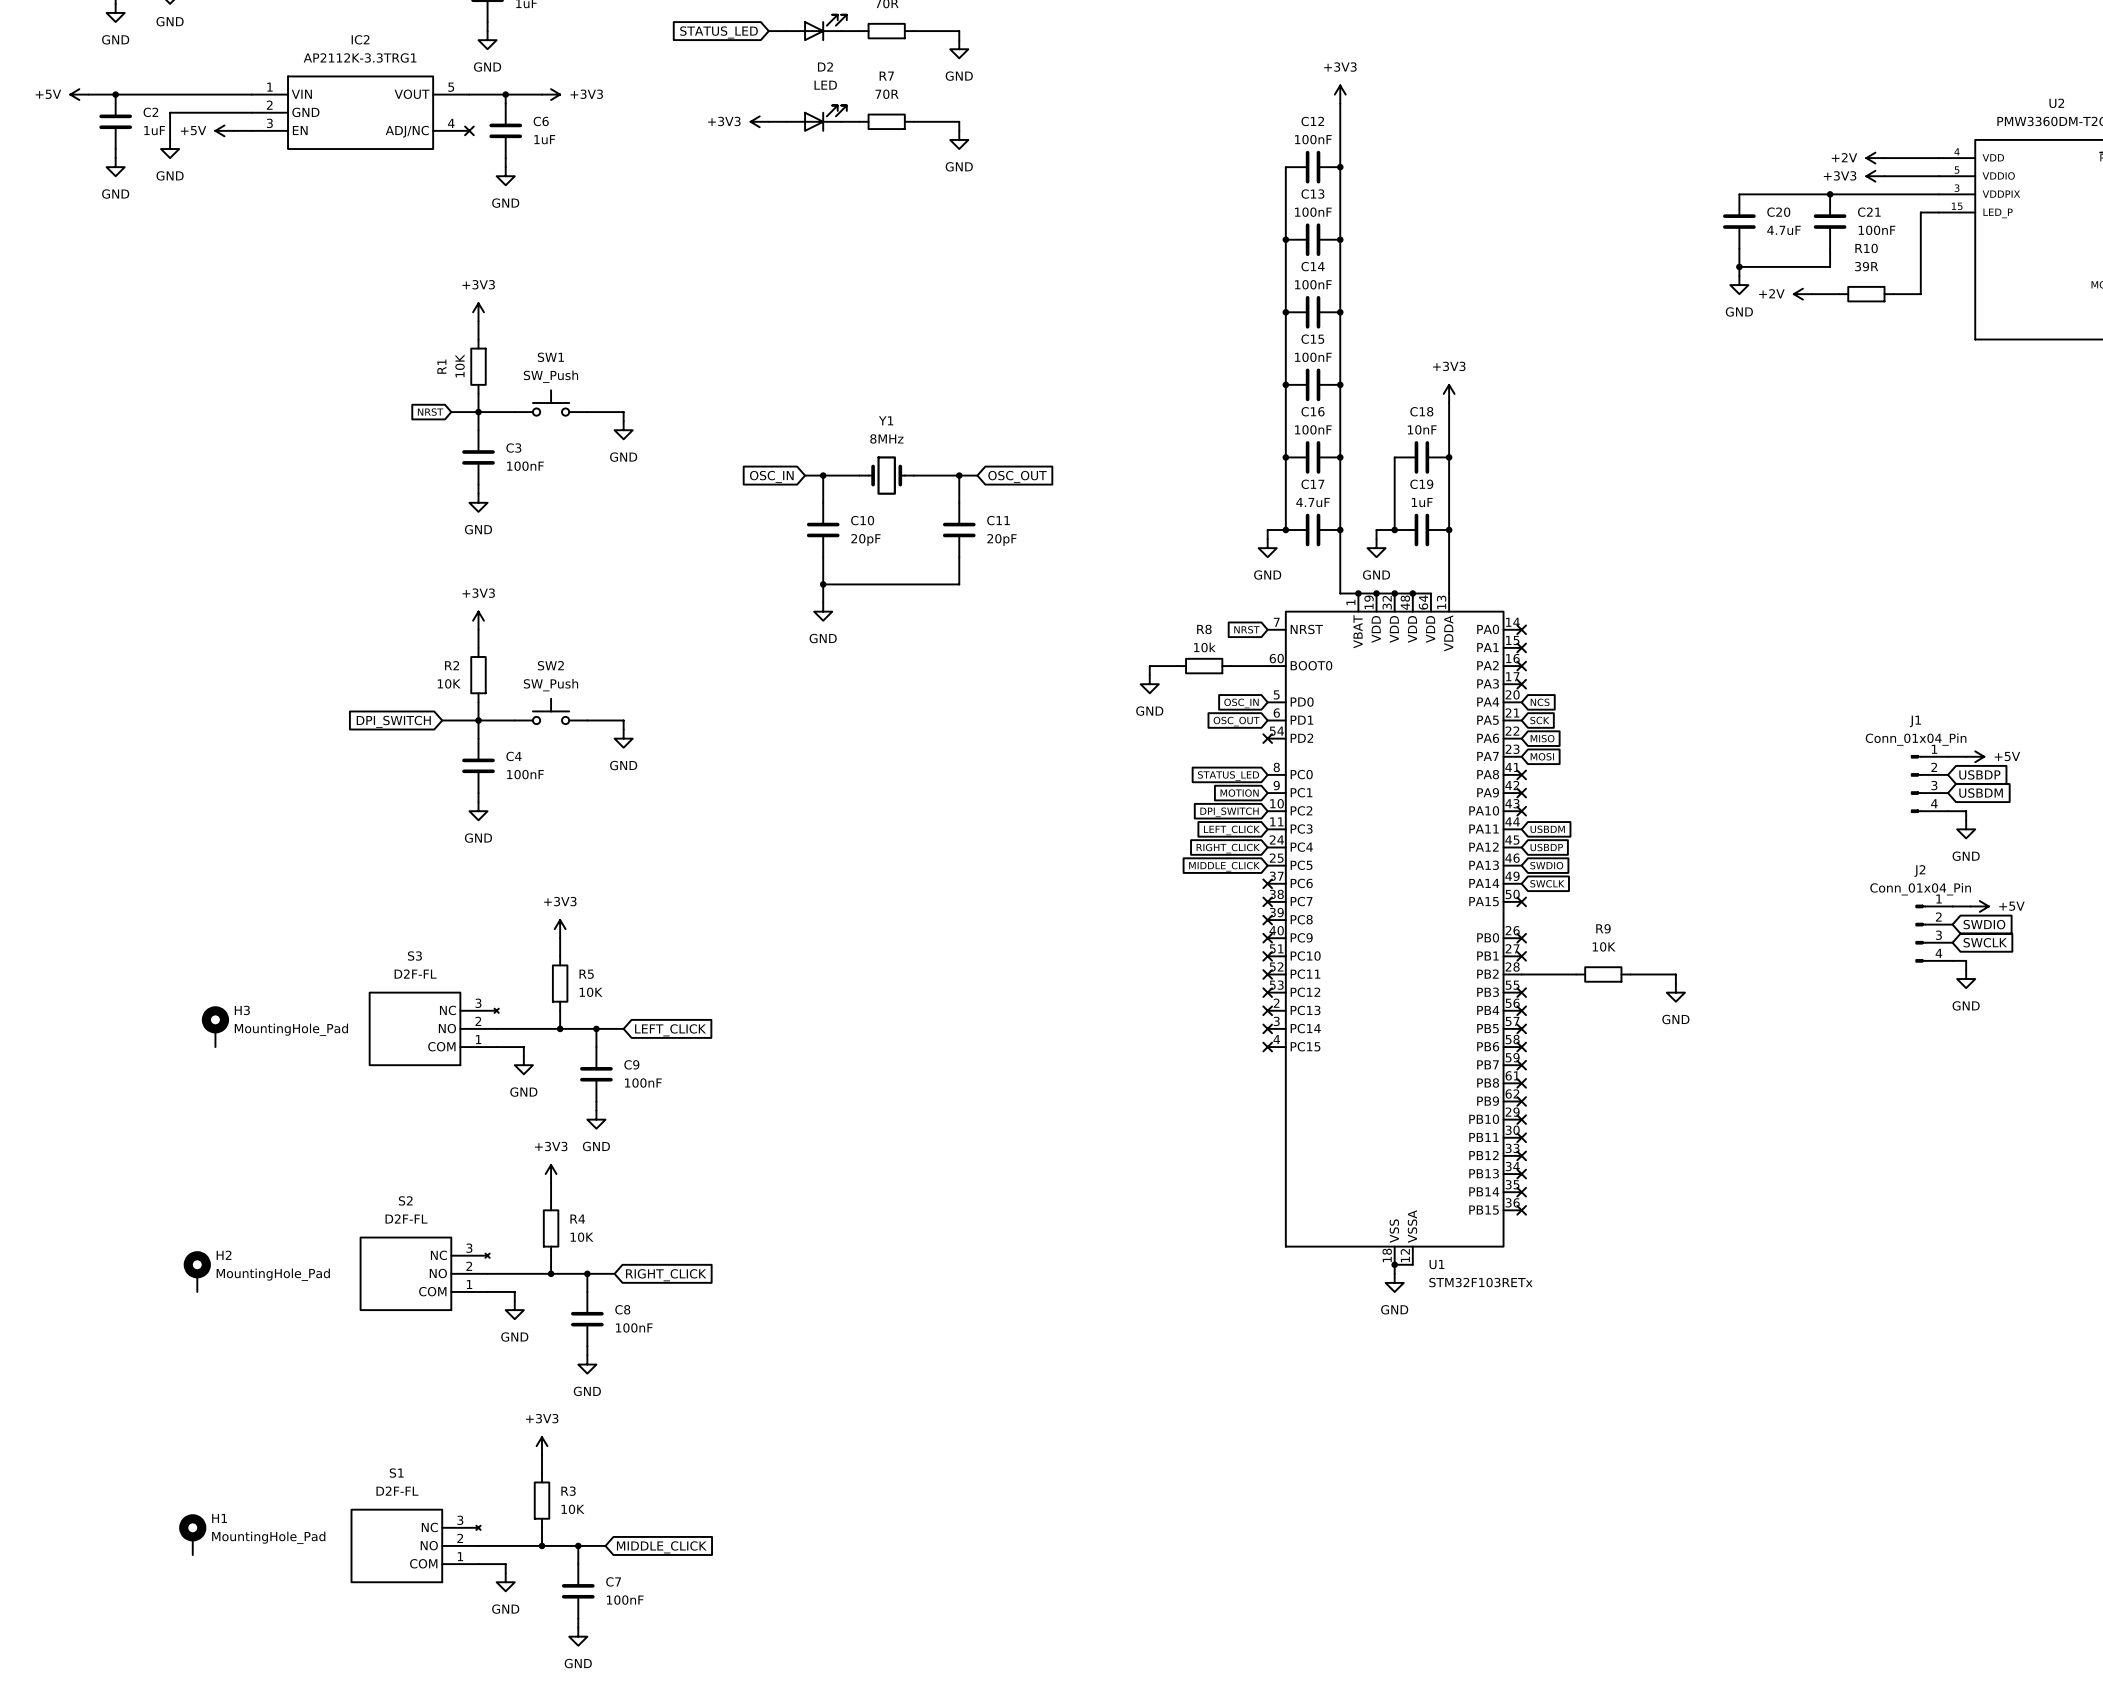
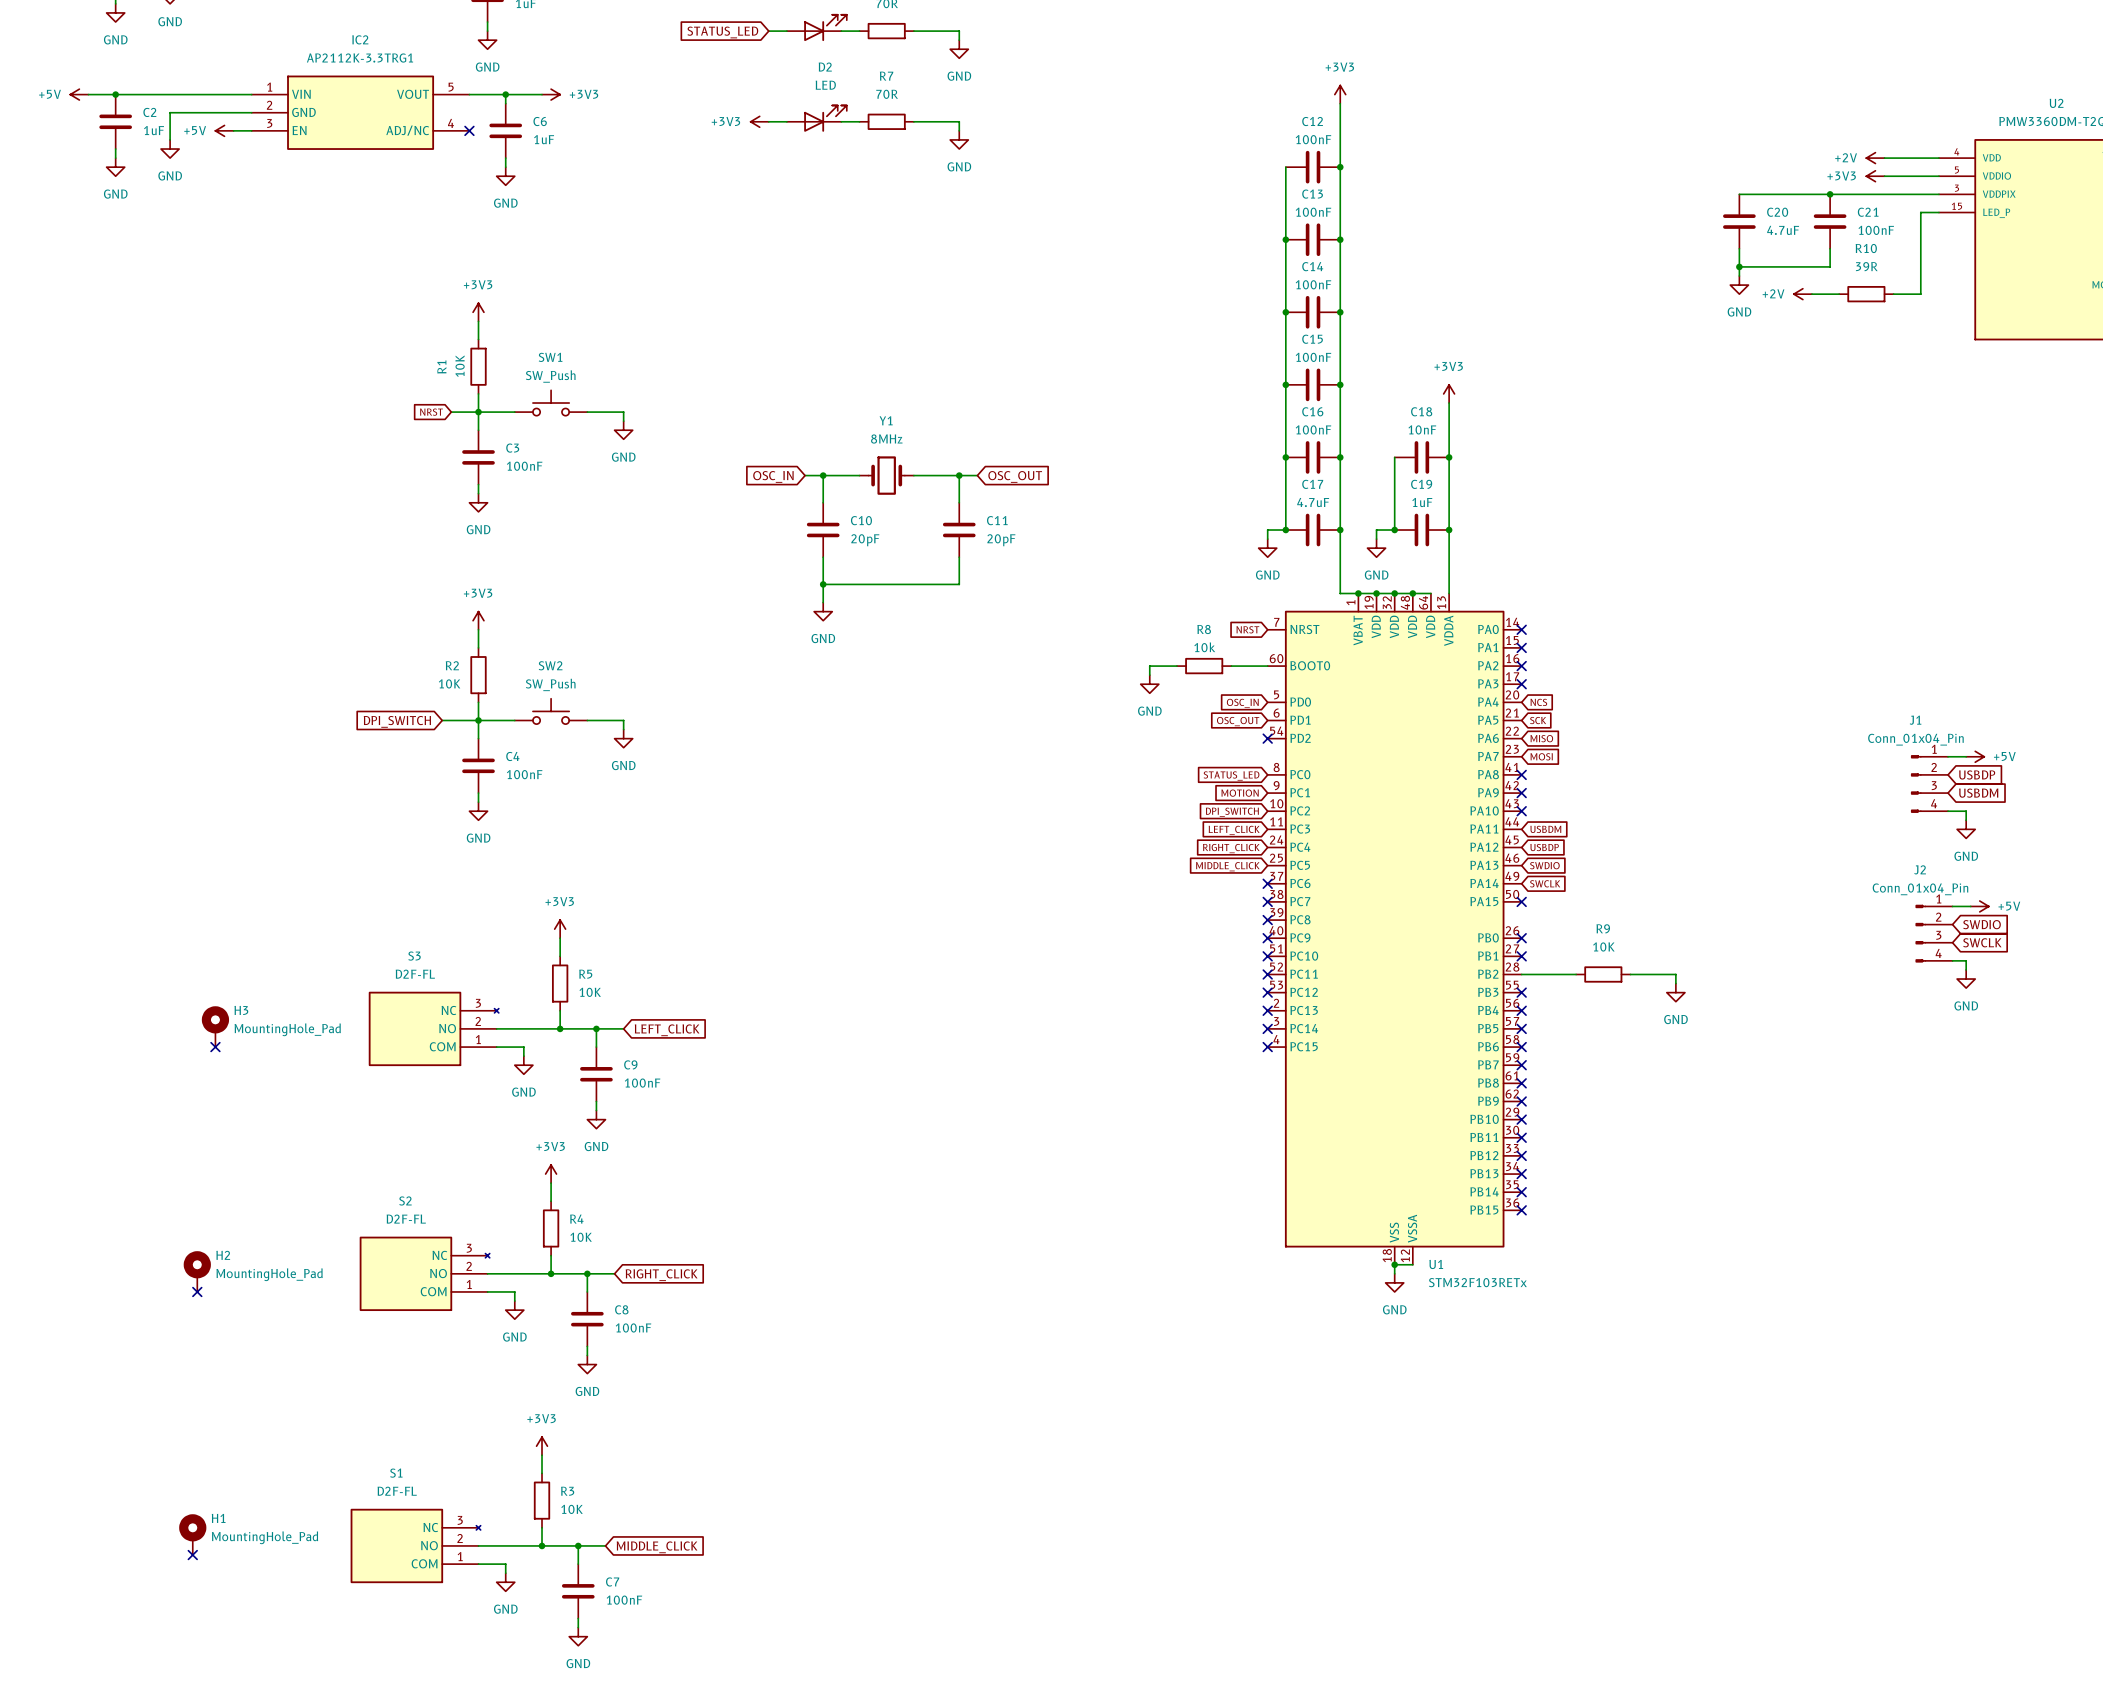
no-connect mark: none -> (215, 1047)
no-connect mark: none -> (197, 1291)
no-connect mark: none -> (192, 1555)

